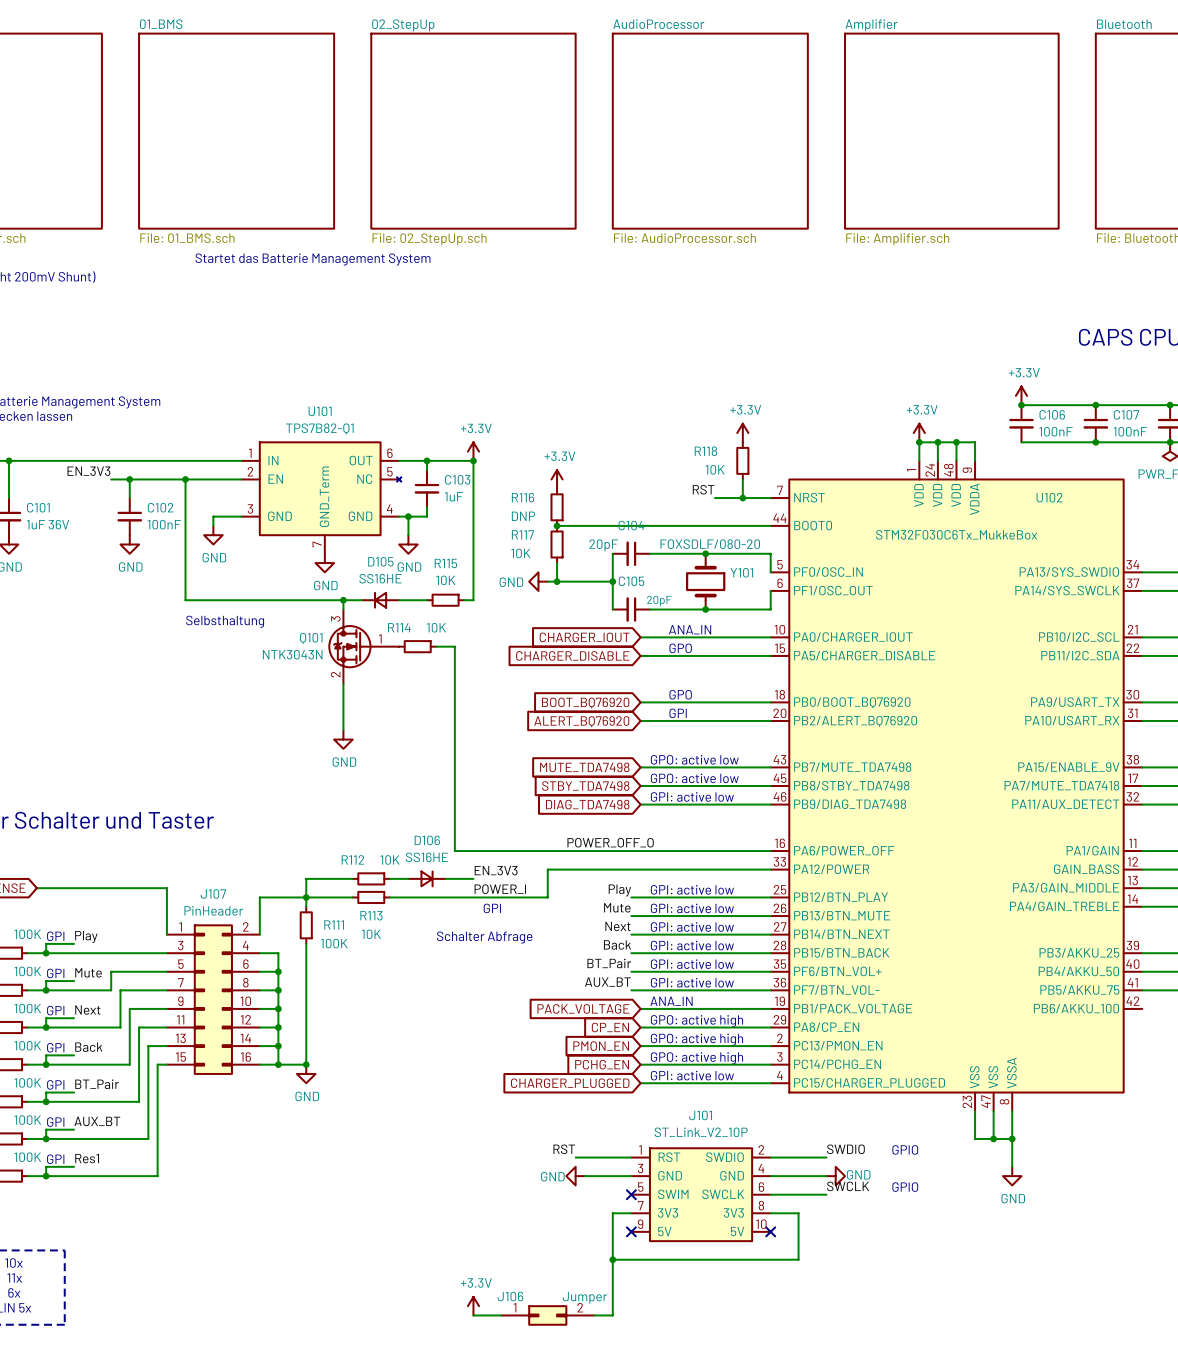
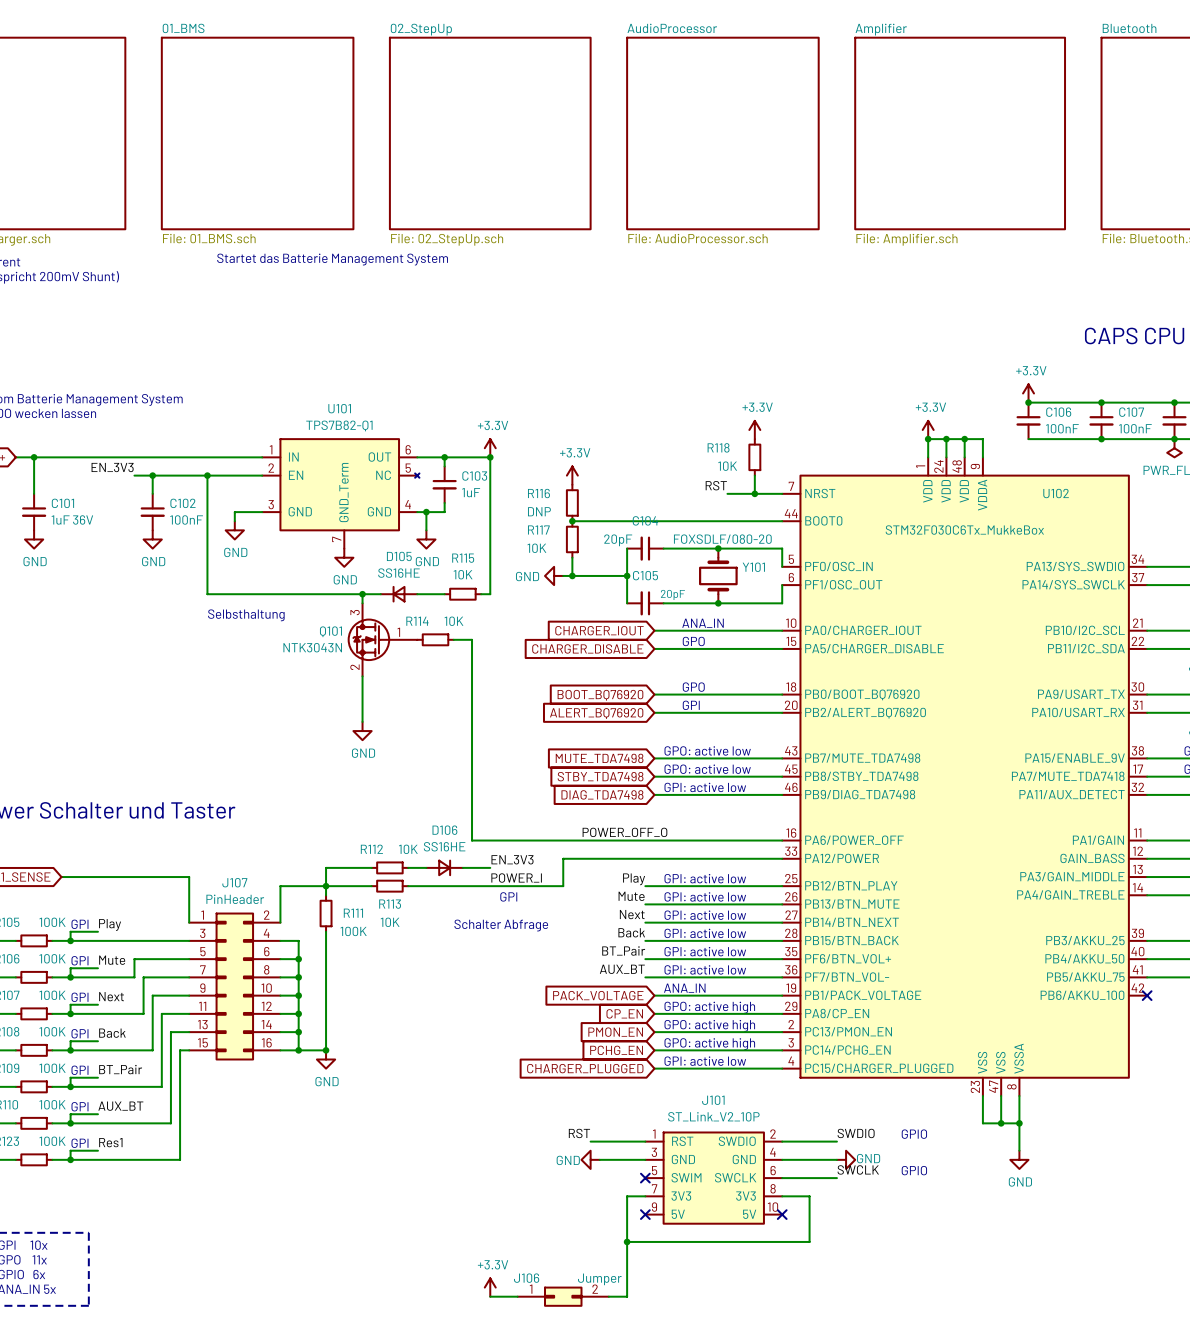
no-connect mark: none -> (1147, 995)

